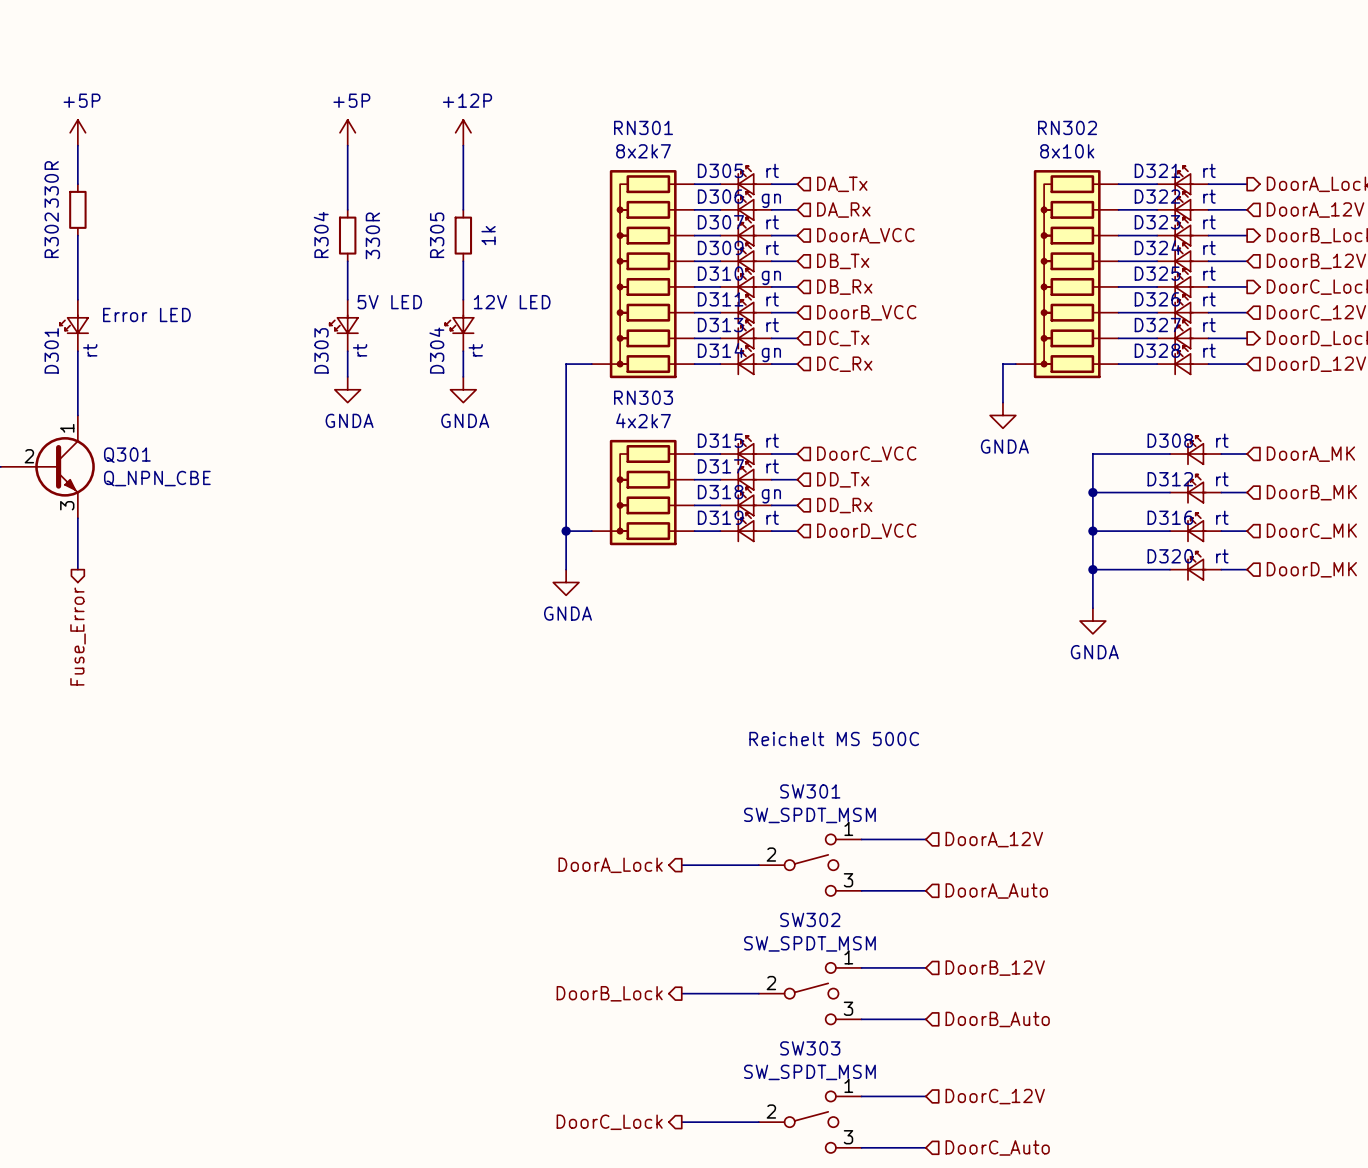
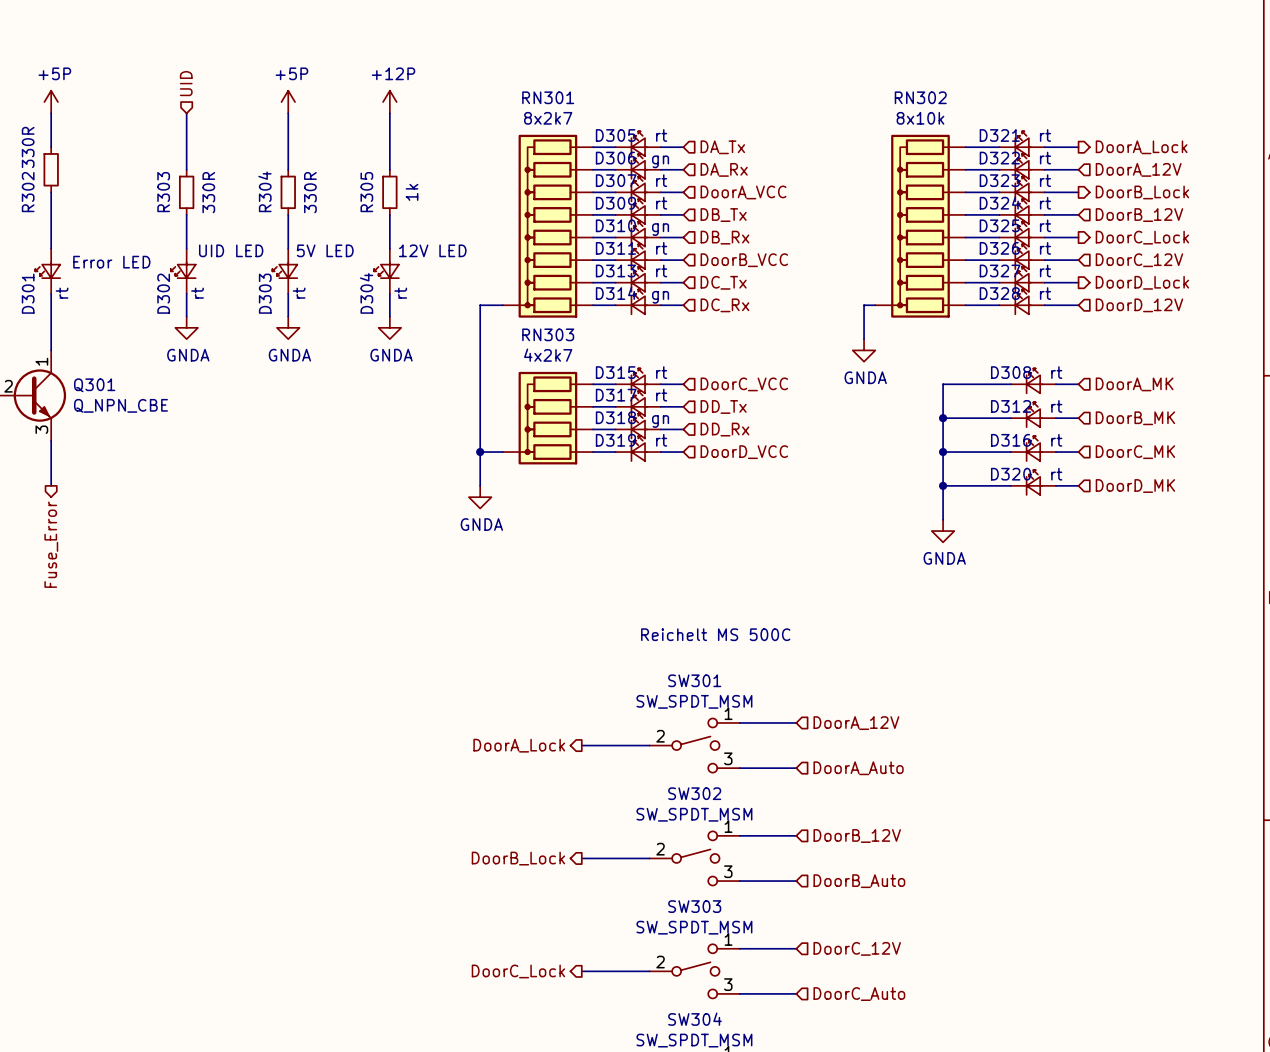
hierarchical label: none -> UID (186, 83)
wire: none -> (186, 113) (186, 169)
R303: none -> 330R (186, 192)
wire: none -> (186, 214) (186, 248)
text: none -> UID LED (231, 250)
D302: none -> rt (183, 271)
wire: none -> (186, 293) (186, 316)
power symbol: none -> GNDA (186, 327)

